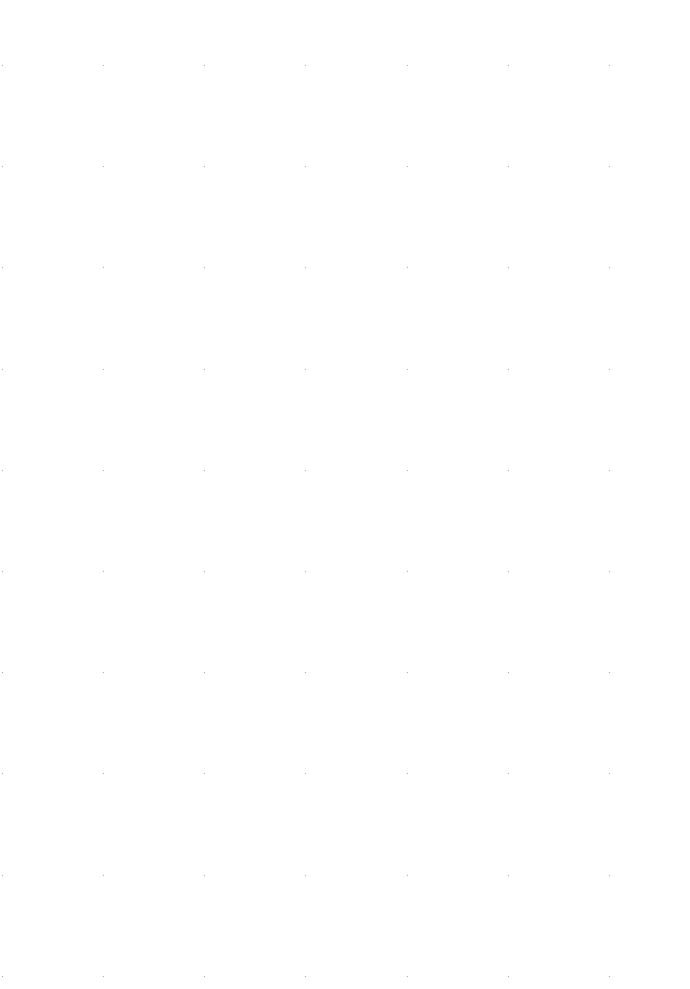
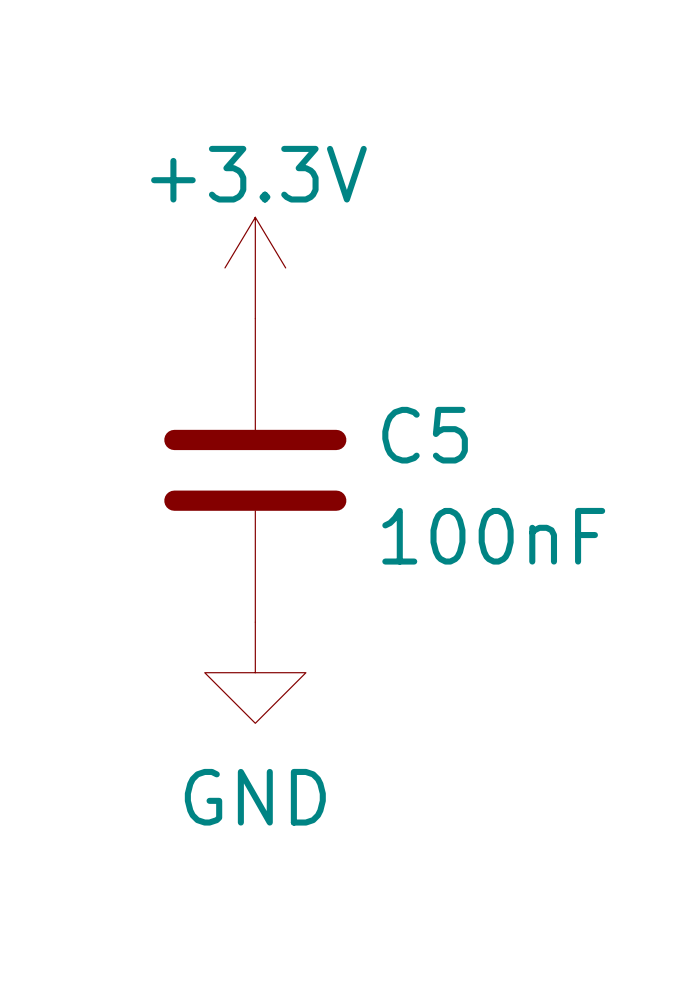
power symbol: none -> +3.3V (255, 267)
C5: none -> 100nF (255, 470)
power symbol: none -> GND (255, 672)

